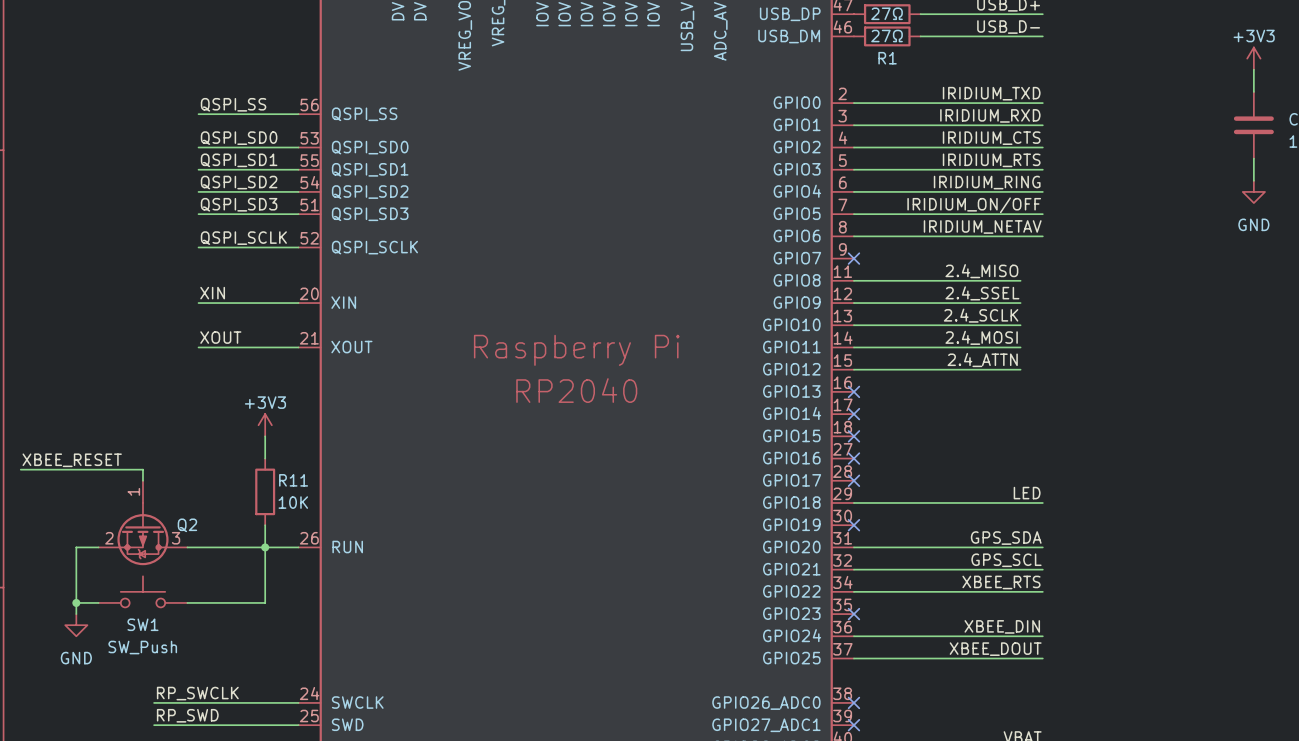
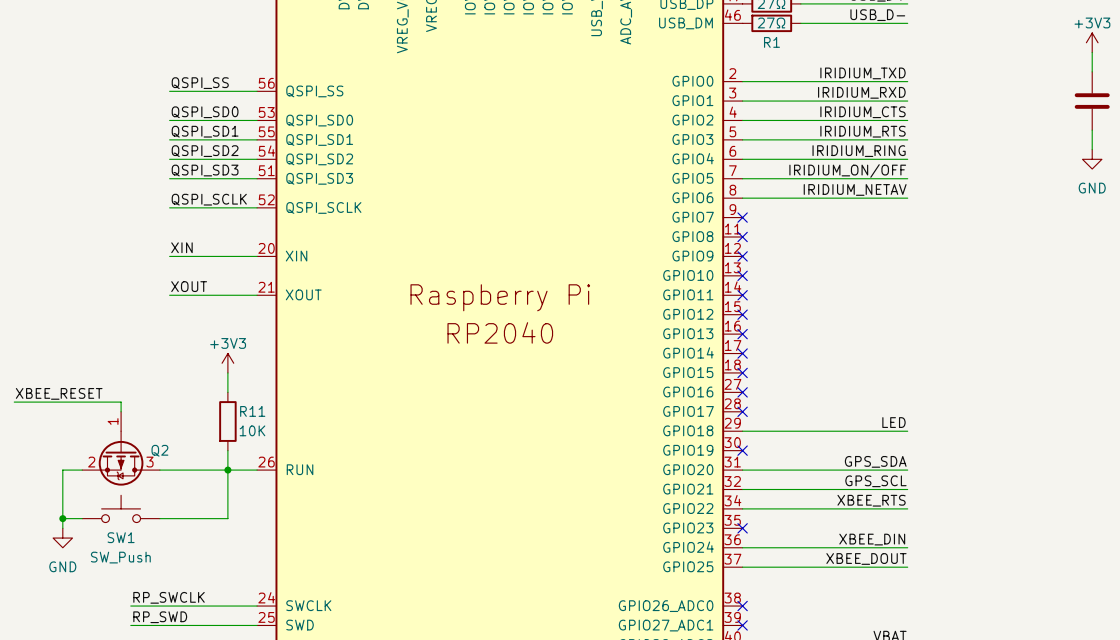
label: 2.4_MISO (981, 271) -> none
wire: (853, 280) (1020, 280) -> none
no-connect mark: none -> (742, 237)
label: 2.4_SSEL (982, 293) -> none
wire: (853, 303) (1020, 303) -> none
no-connect mark: none -> (742, 256)
label: 2.4_SCLK (981, 315) -> none
wire: (853, 325) (1020, 325) -> none
no-connect mark: none -> (742, 275)
label: 2.4_MOSI (981, 337) -> none
wire: (853, 347) (1020, 347) -> none
no-connect mark: none -> (742, 295)
label: 2.4_ATTN (982, 360) -> none
wire: (853, 369) (1020, 369) -> none
no-connect mark: none -> (742, 314)

